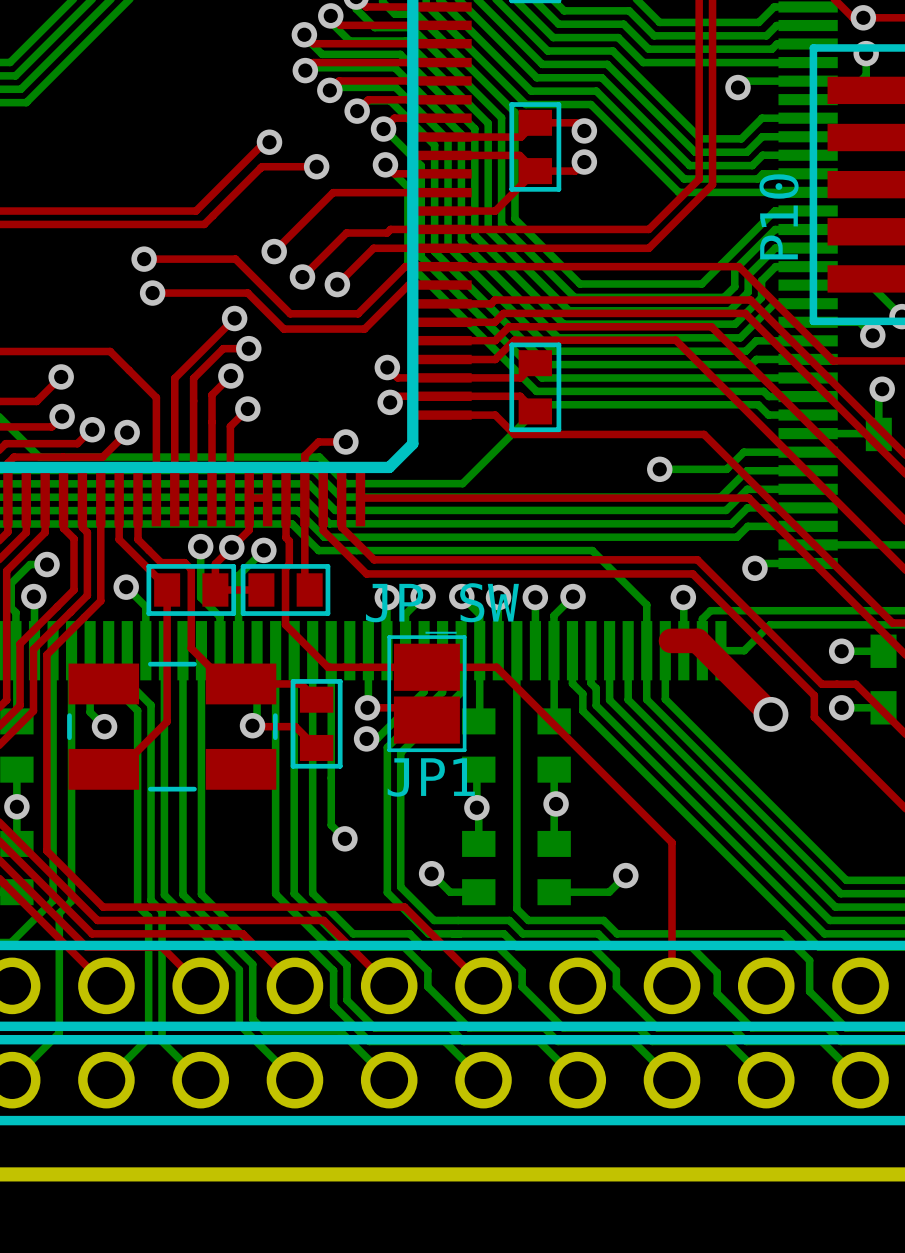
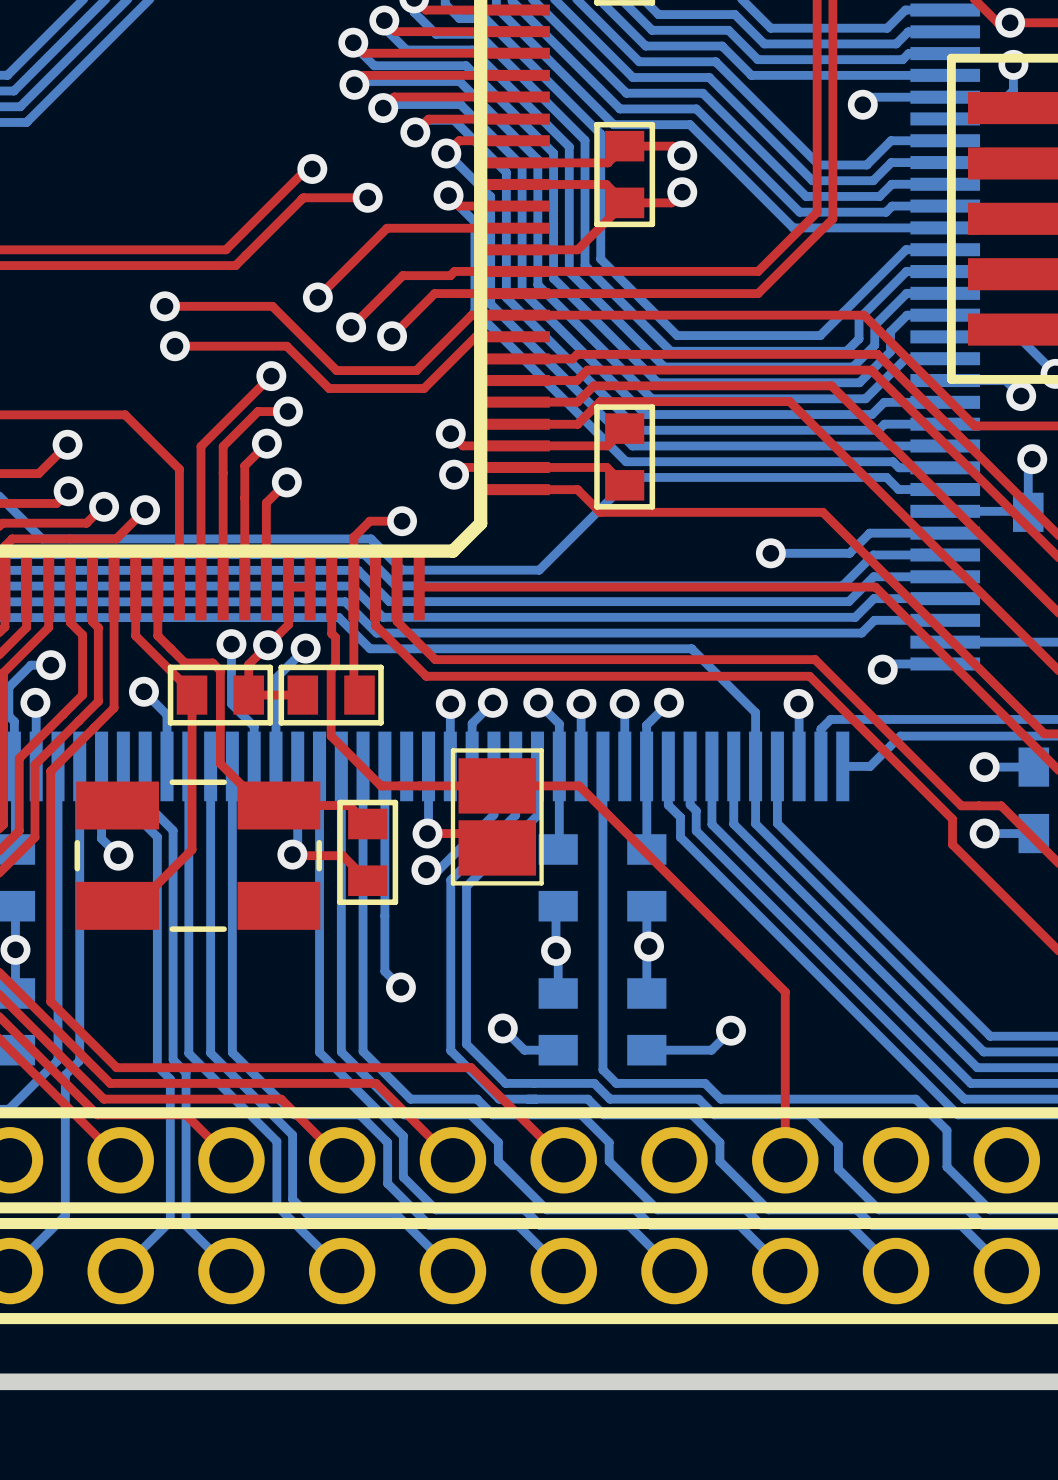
P10 name: P10 (779, 216) -> none
JP1 value: JP_SW (442, 608) -> none
top track: (670, 640) (697, 640) (770, 714) -> none
via: (770, 714) -> none
JP1 name: JP1 (431, 777) -> none

